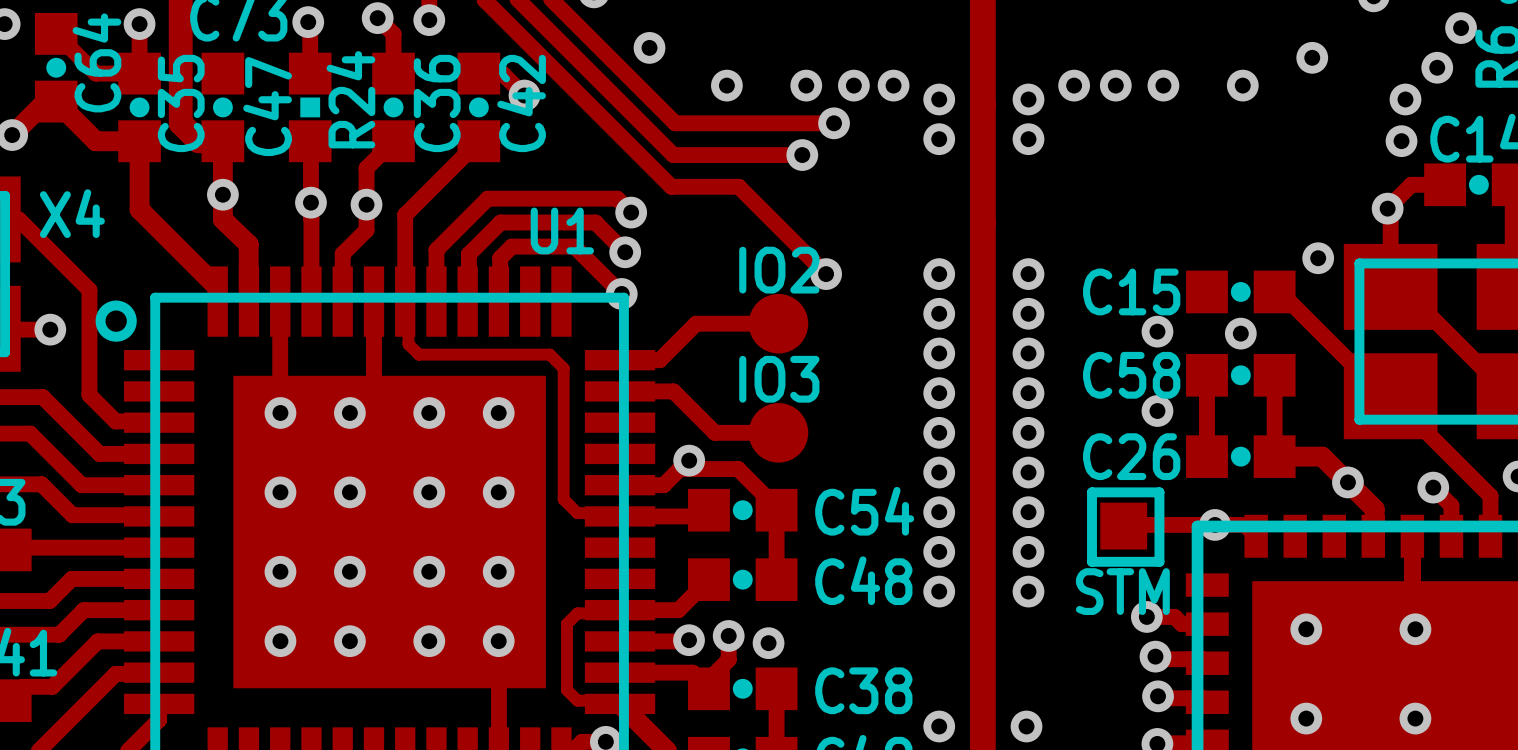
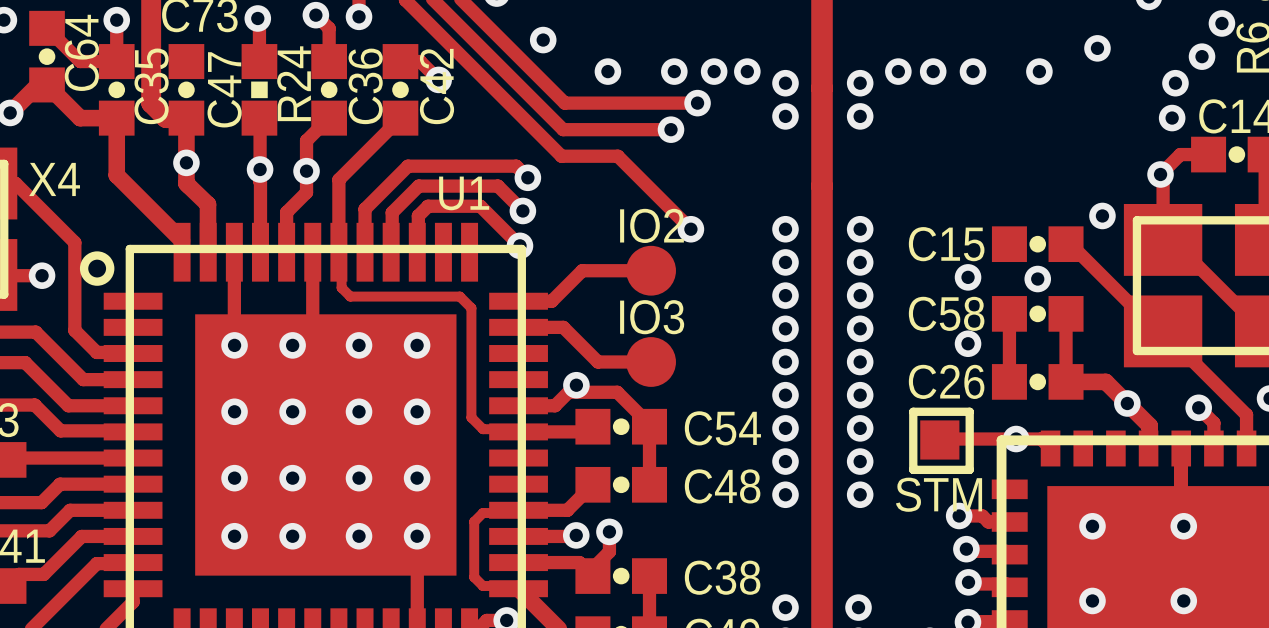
via: (768, 643) -> none

